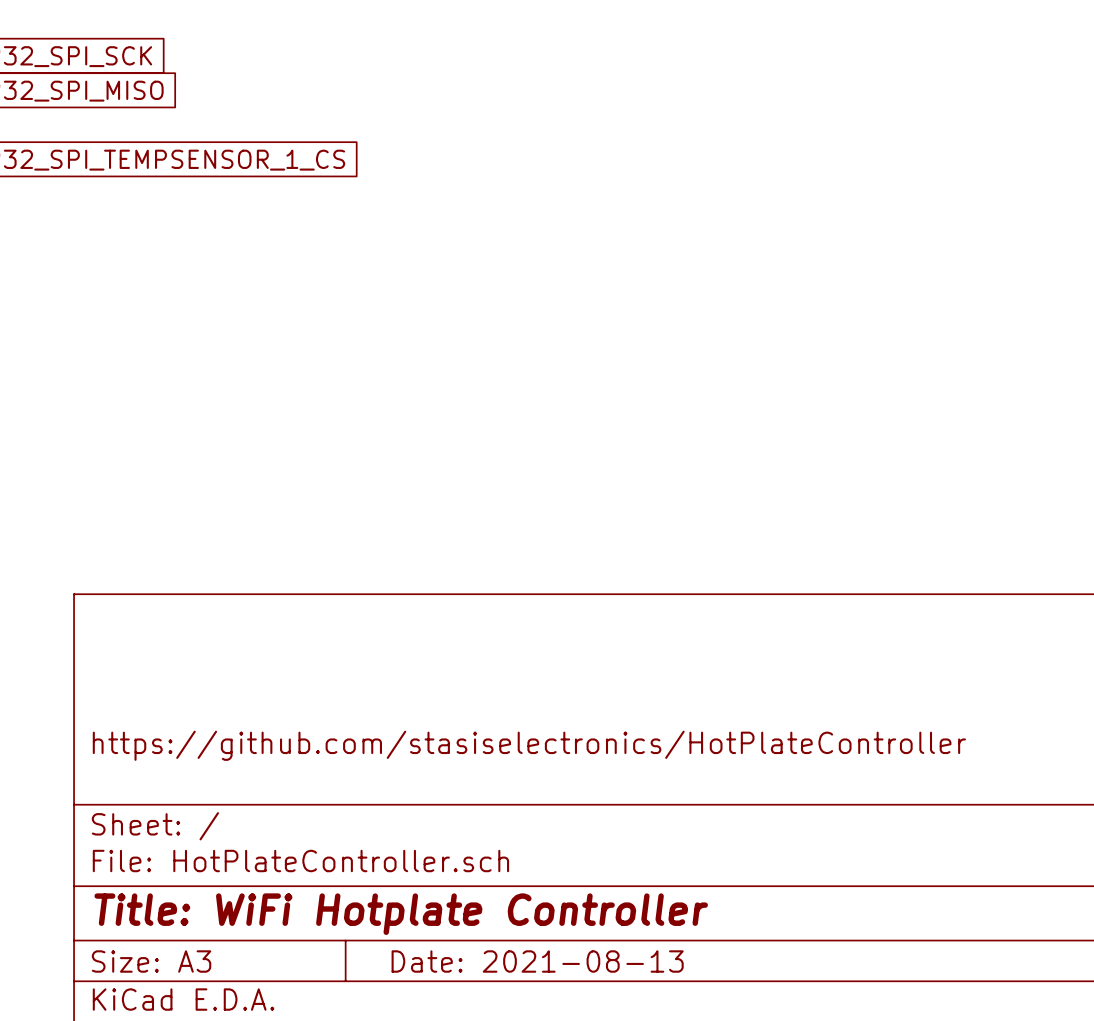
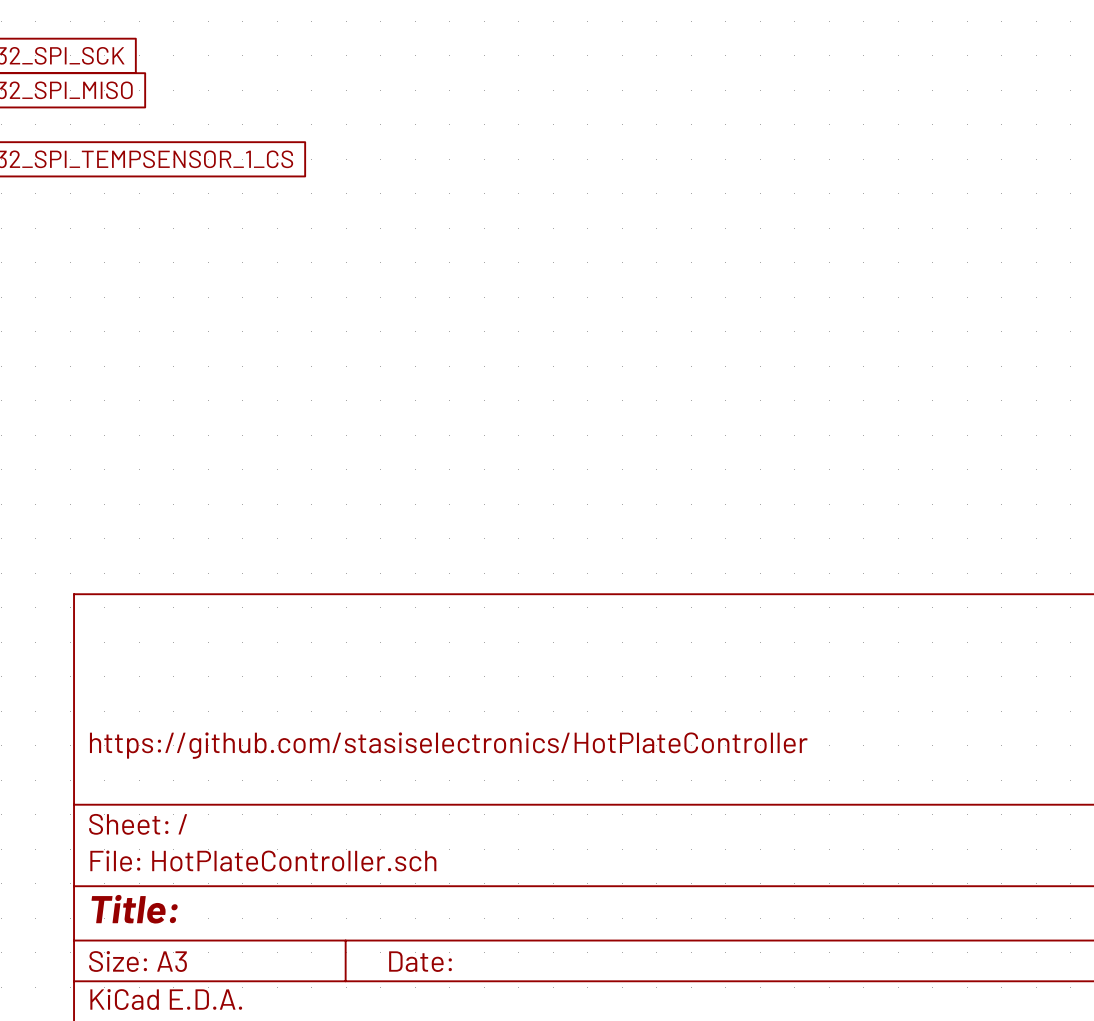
title block: Title: WiFi Hotplate Controller (401, 914) -> Title: (134, 909)
title block: Date: 2021-08-13 (537, 961) -> Date: (420, 961)

